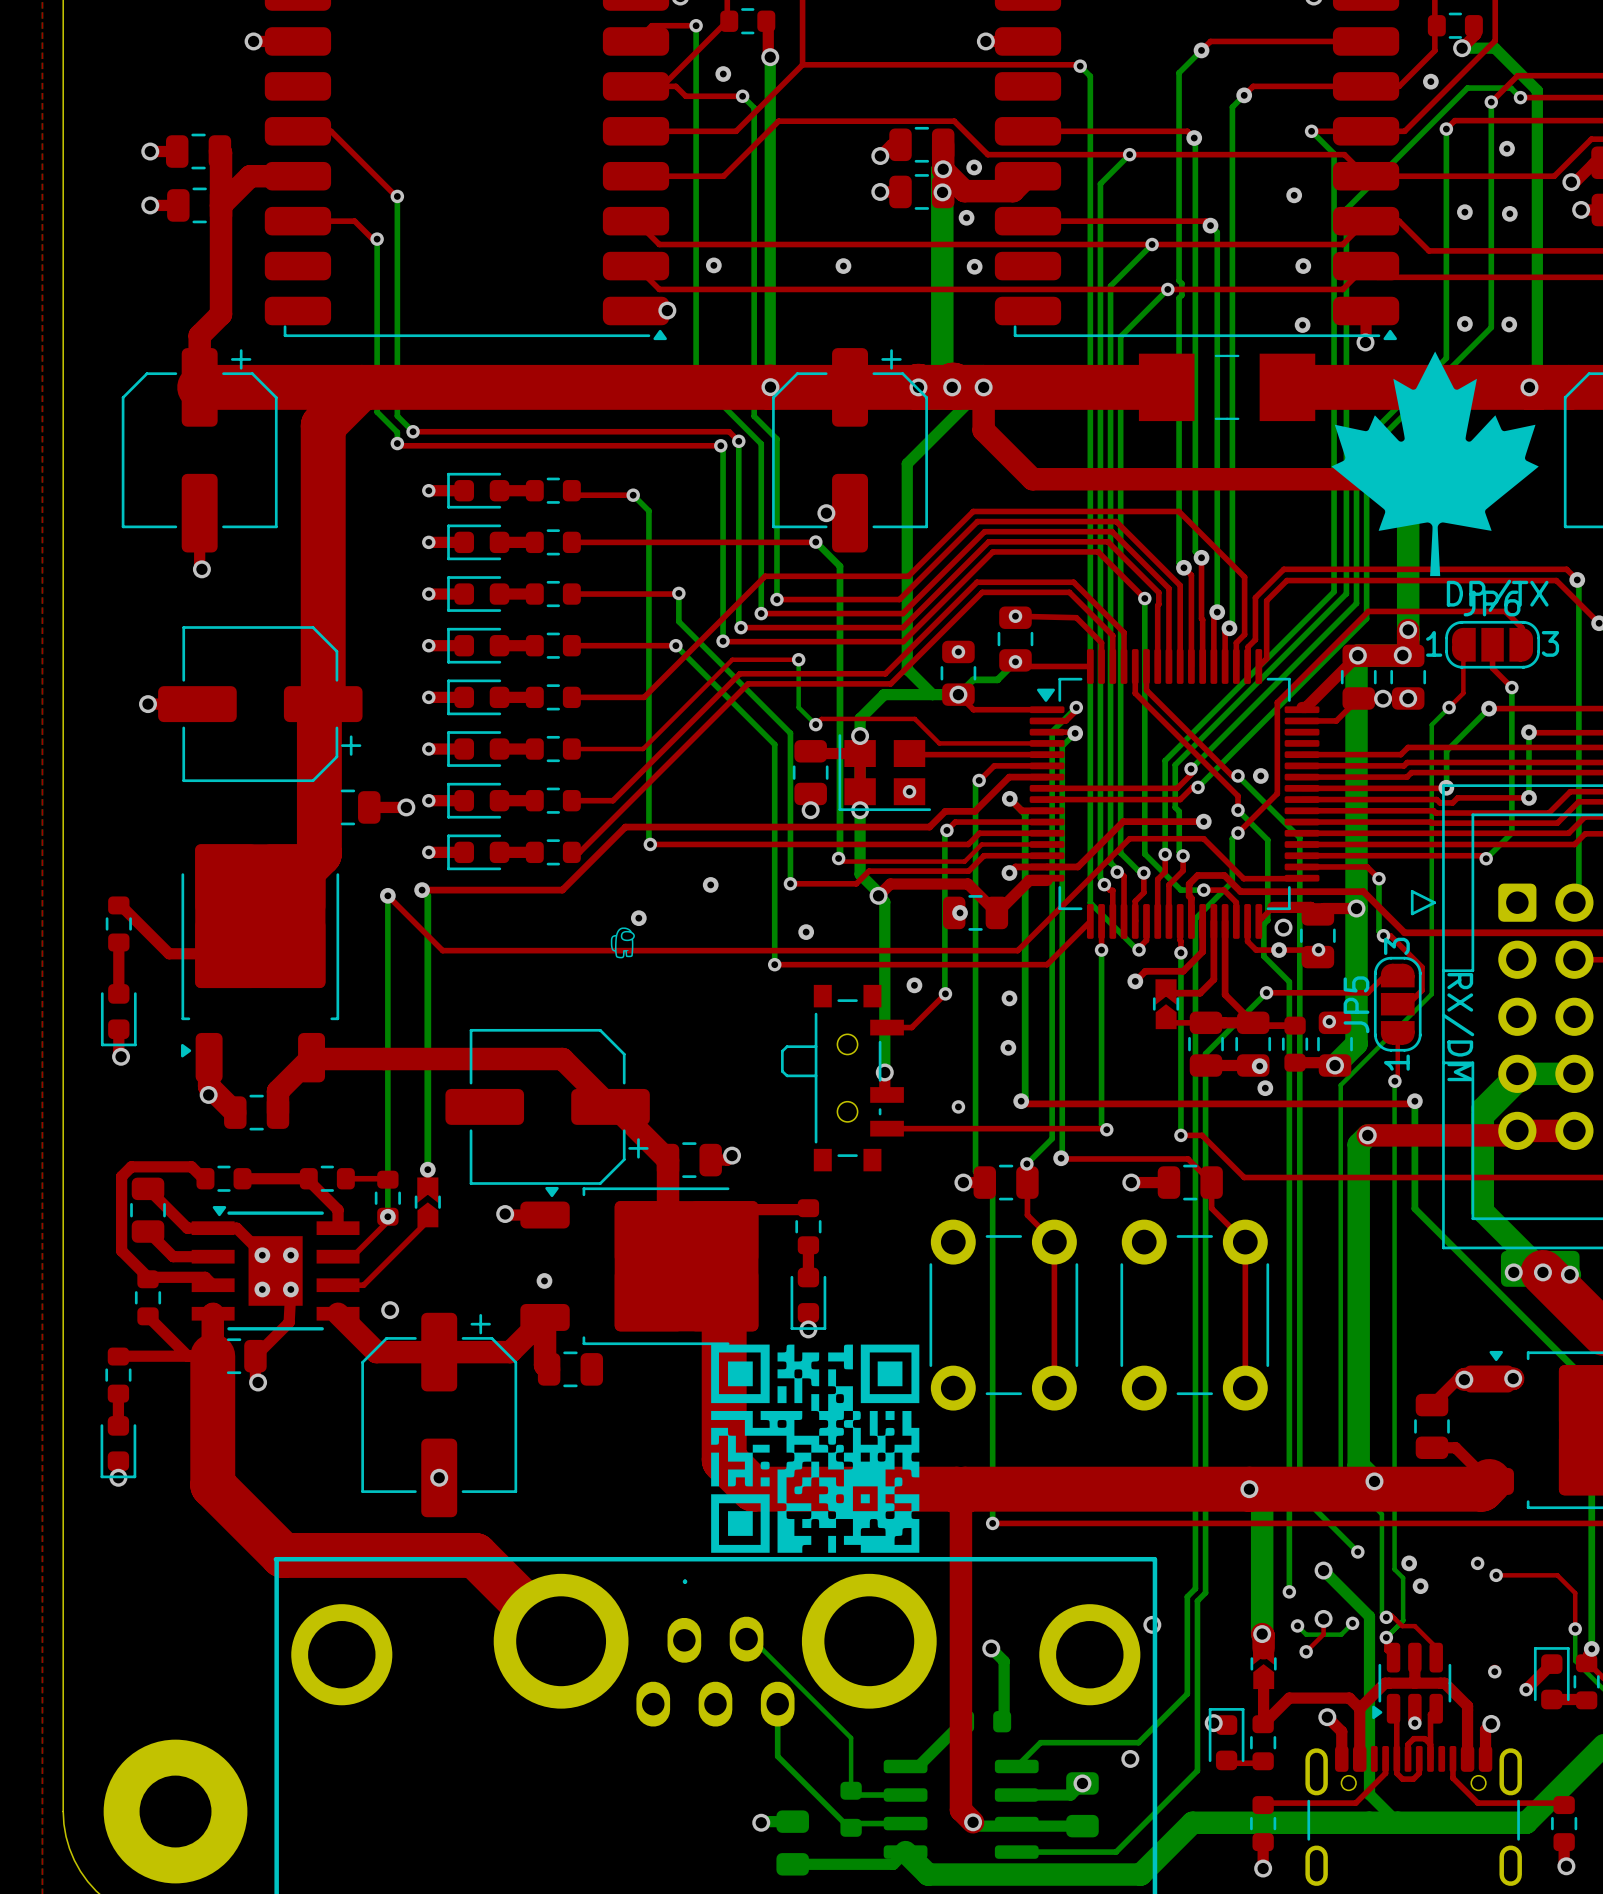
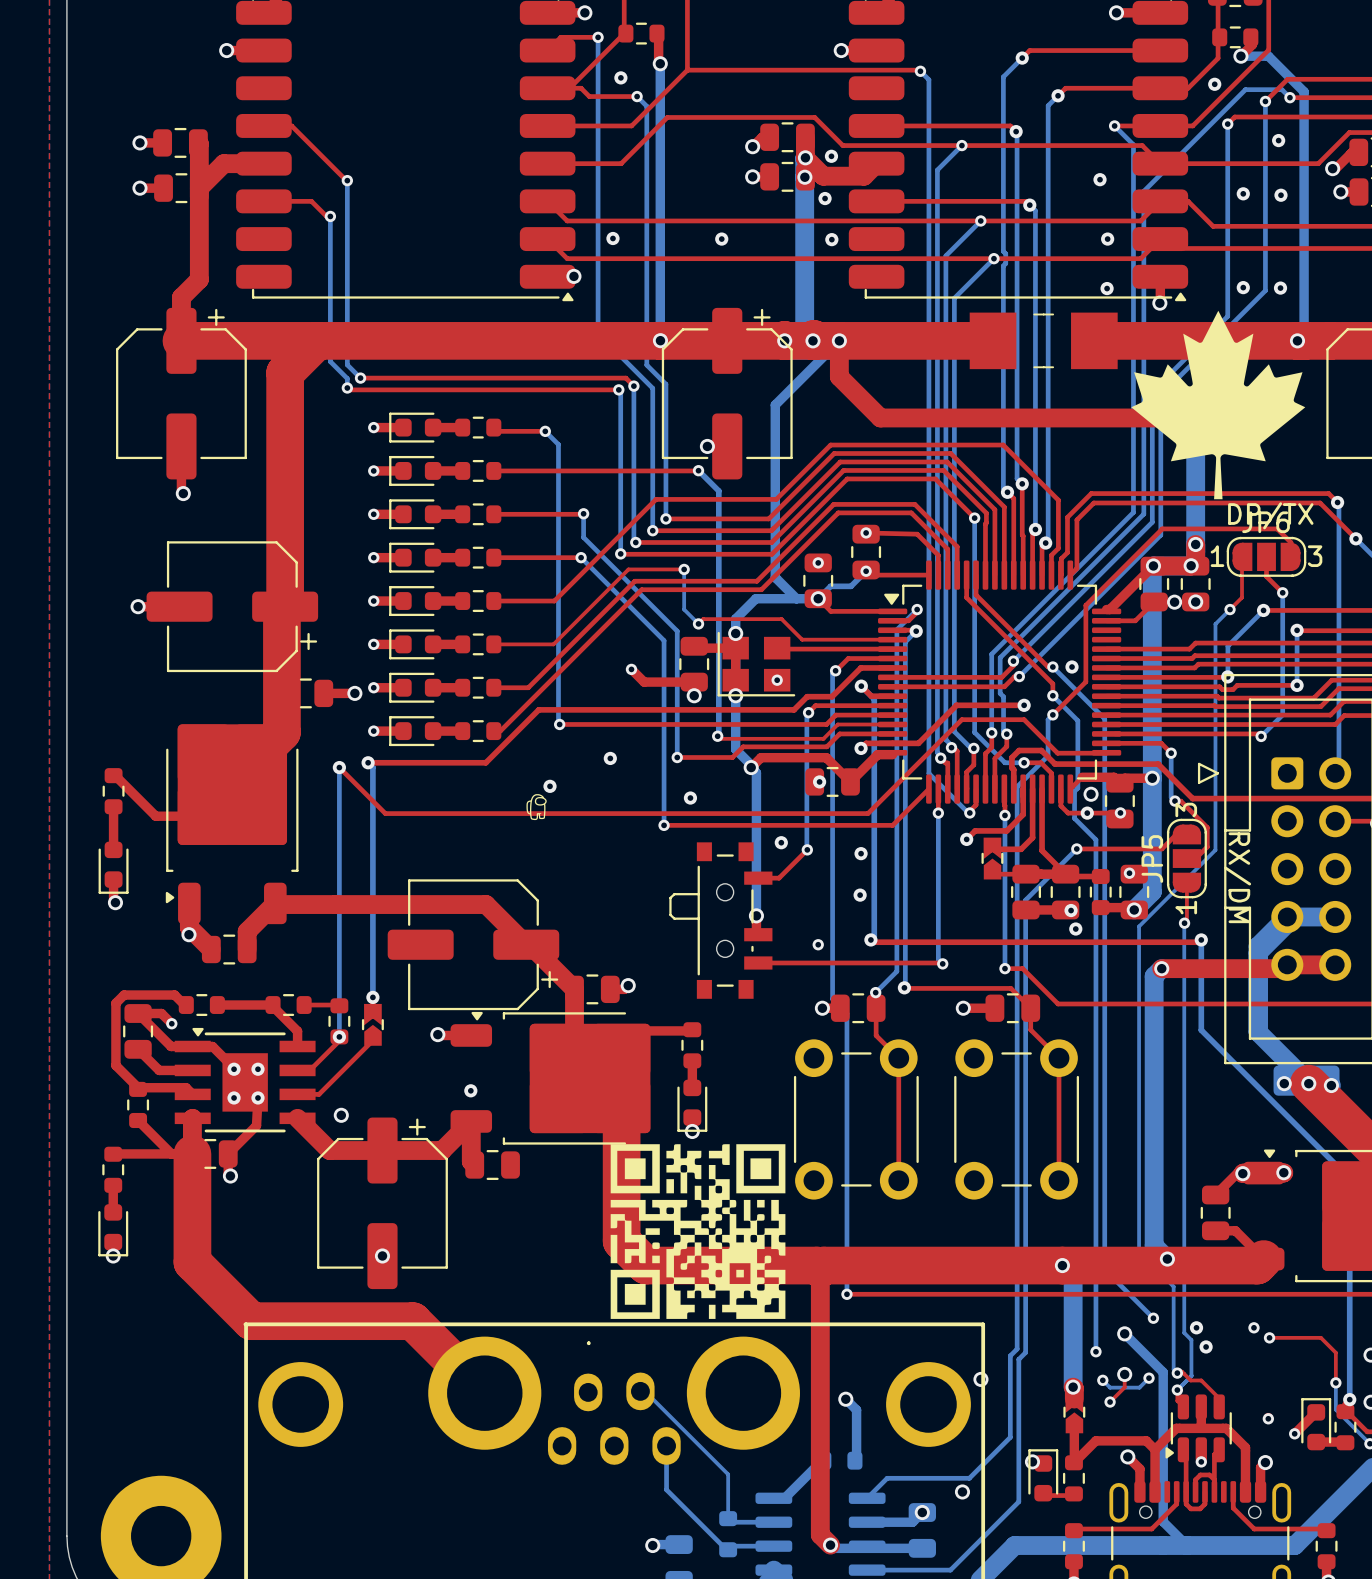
top track: none -> (631, 669) (644, 682) (694, 682)
via: none -> (631, 669)
top track: none -> (138, 1013) (161, 1013) (171, 1023)
via: none -> (171, 1023)

